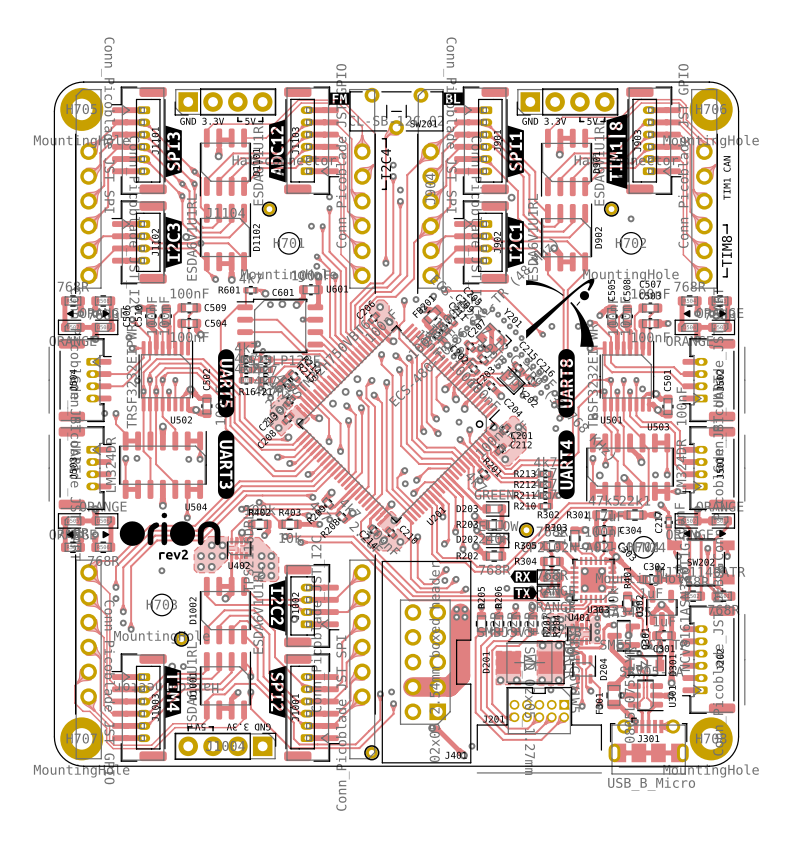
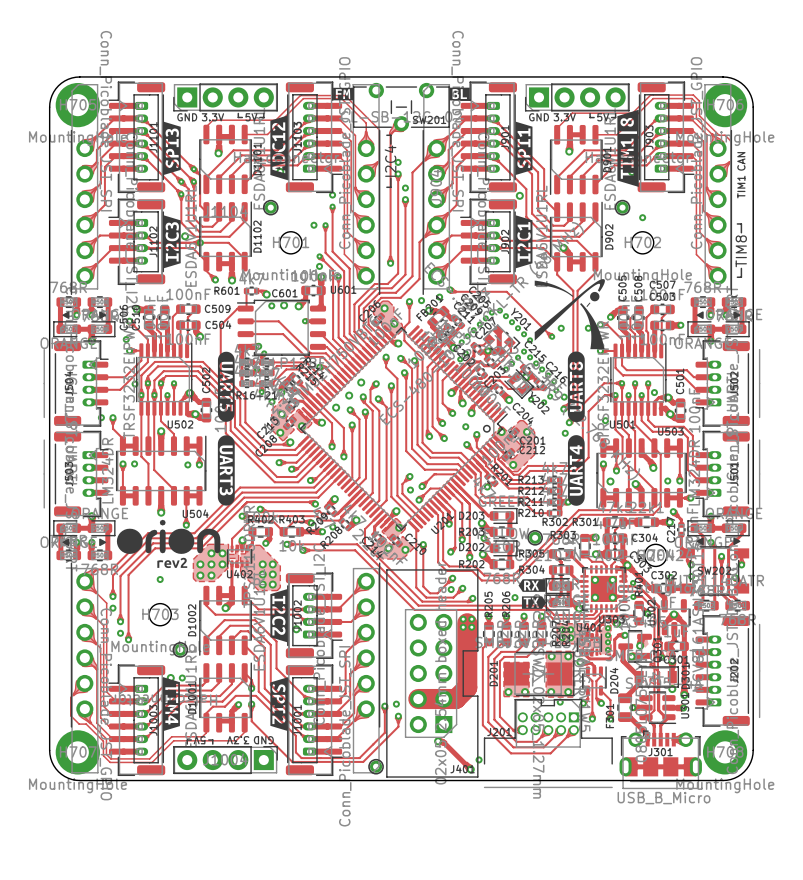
via: none -> (633, 583)
track: (627, 582) (642, 597) (642, 610) (635, 614) (642, 619) (643, 635) -> (639, 591) (643, 591) (657, 605) (657, 710) (666, 717)
track: none -> (633, 596) (642, 596) (654, 609)
via: none -> (633, 596)
via: (643, 635) -> none
via: (639, 653) -> none
track: (639, 668) (643, 672) (643, 697) (635, 704) -> (654, 608) (654, 710) (647, 717)
via: (639, 668) -> none
via: none -> (672, 689)

